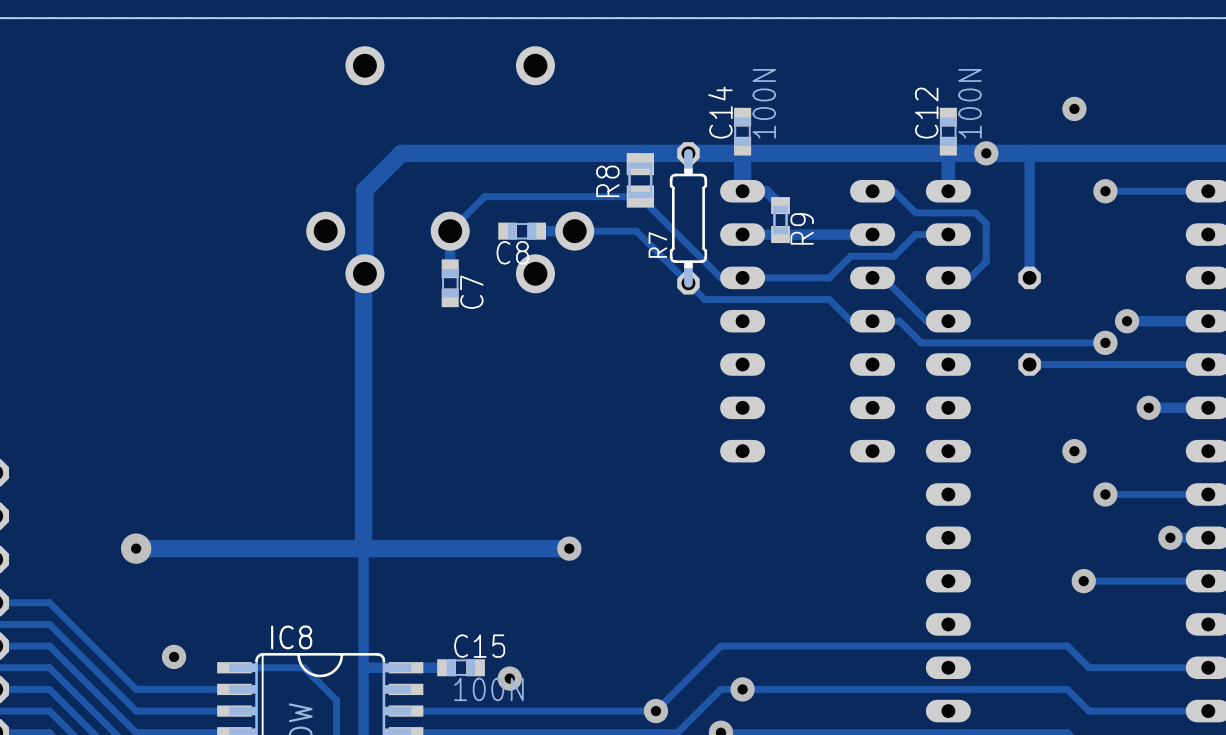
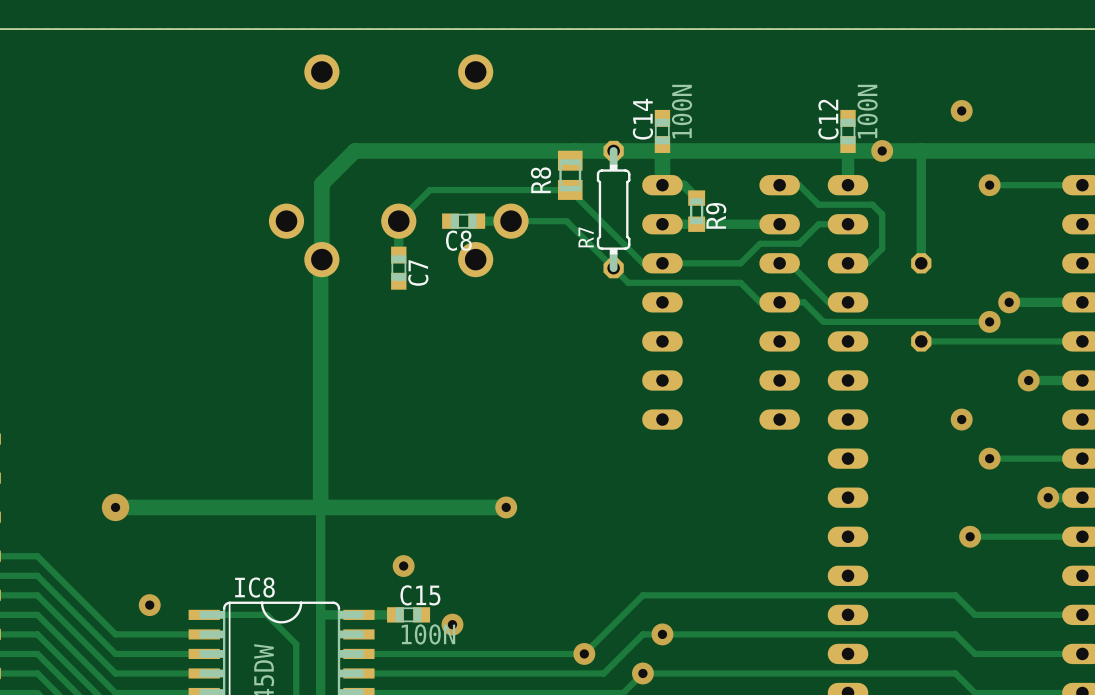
via: none -> (403, 566)

